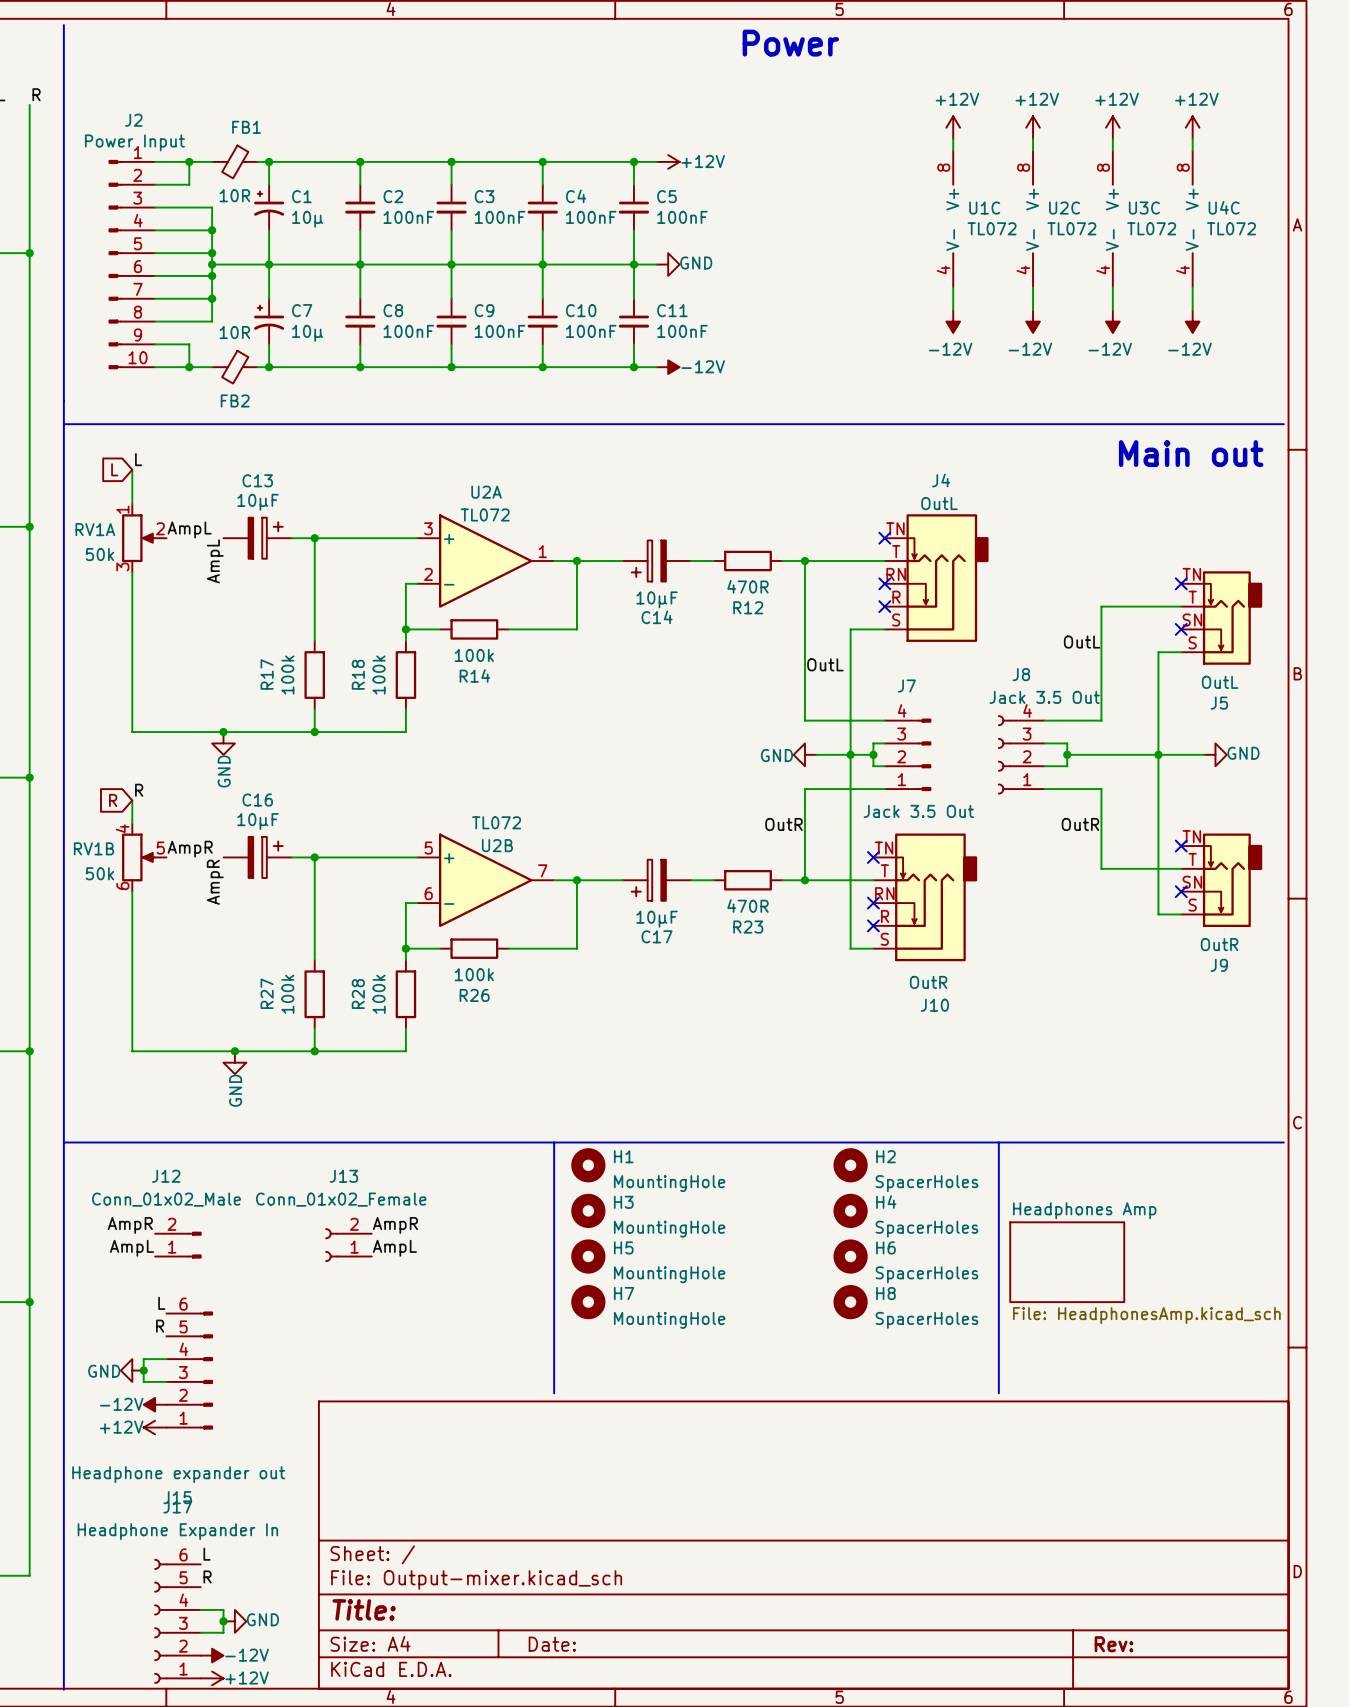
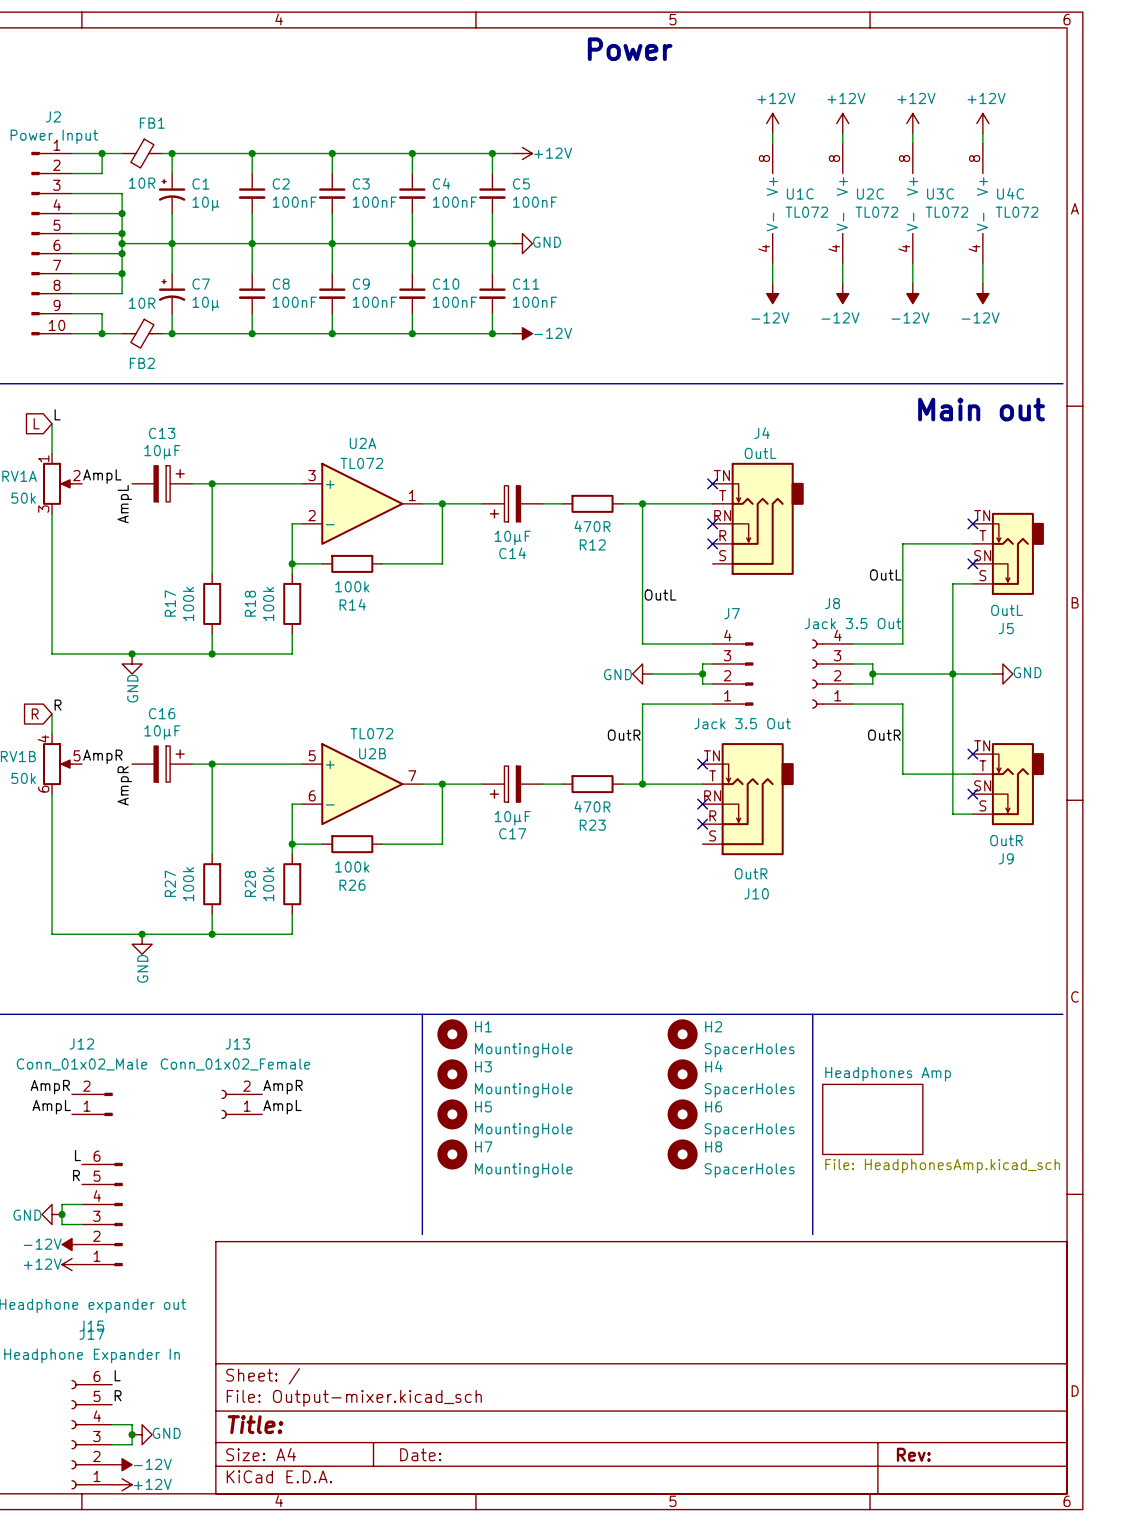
wire: (884, 629) (850, 629) (850, 948) (873, 948) -> none
junction: (850, 754) -> none

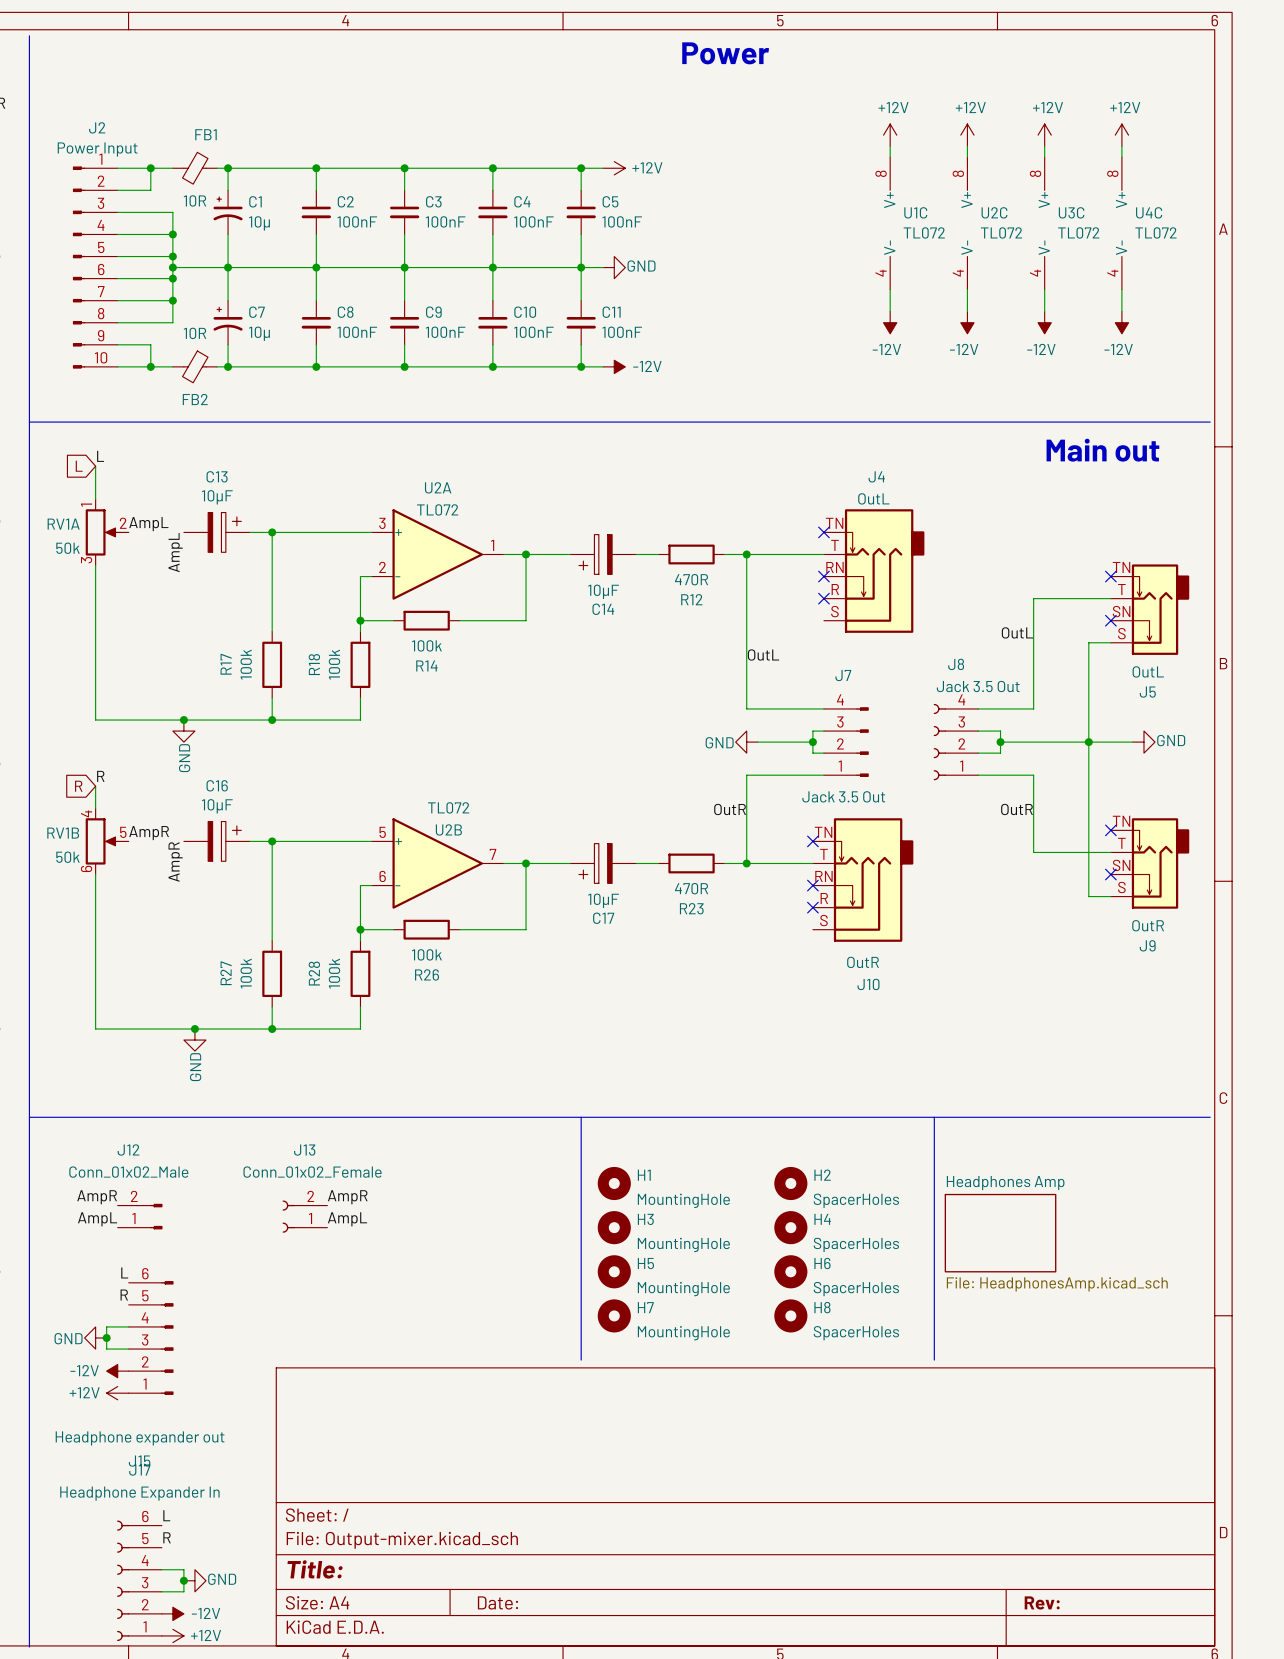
line: (422, 1014) (422, 1234) -> (581, 1117) (581, 1360)
H1 position: (452, 1034) -> (614, 1183)
H2: SpacerHoles (682, 1034) -> none
H4 name: H4 (713, 1066) -> H2 (822, 1175)
H3 position: (452, 1074) -> (614, 1227)
H6 name: H6 (713, 1106) -> H4 (822, 1219)
H5 position: (452, 1114) -> (614, 1271)
H8 name: H8 (713, 1146) -> H6 (822, 1263)
H7 position: (452, 1154) -> (614, 1315)
H8: none -> SpacerHoles (790, 1315)

